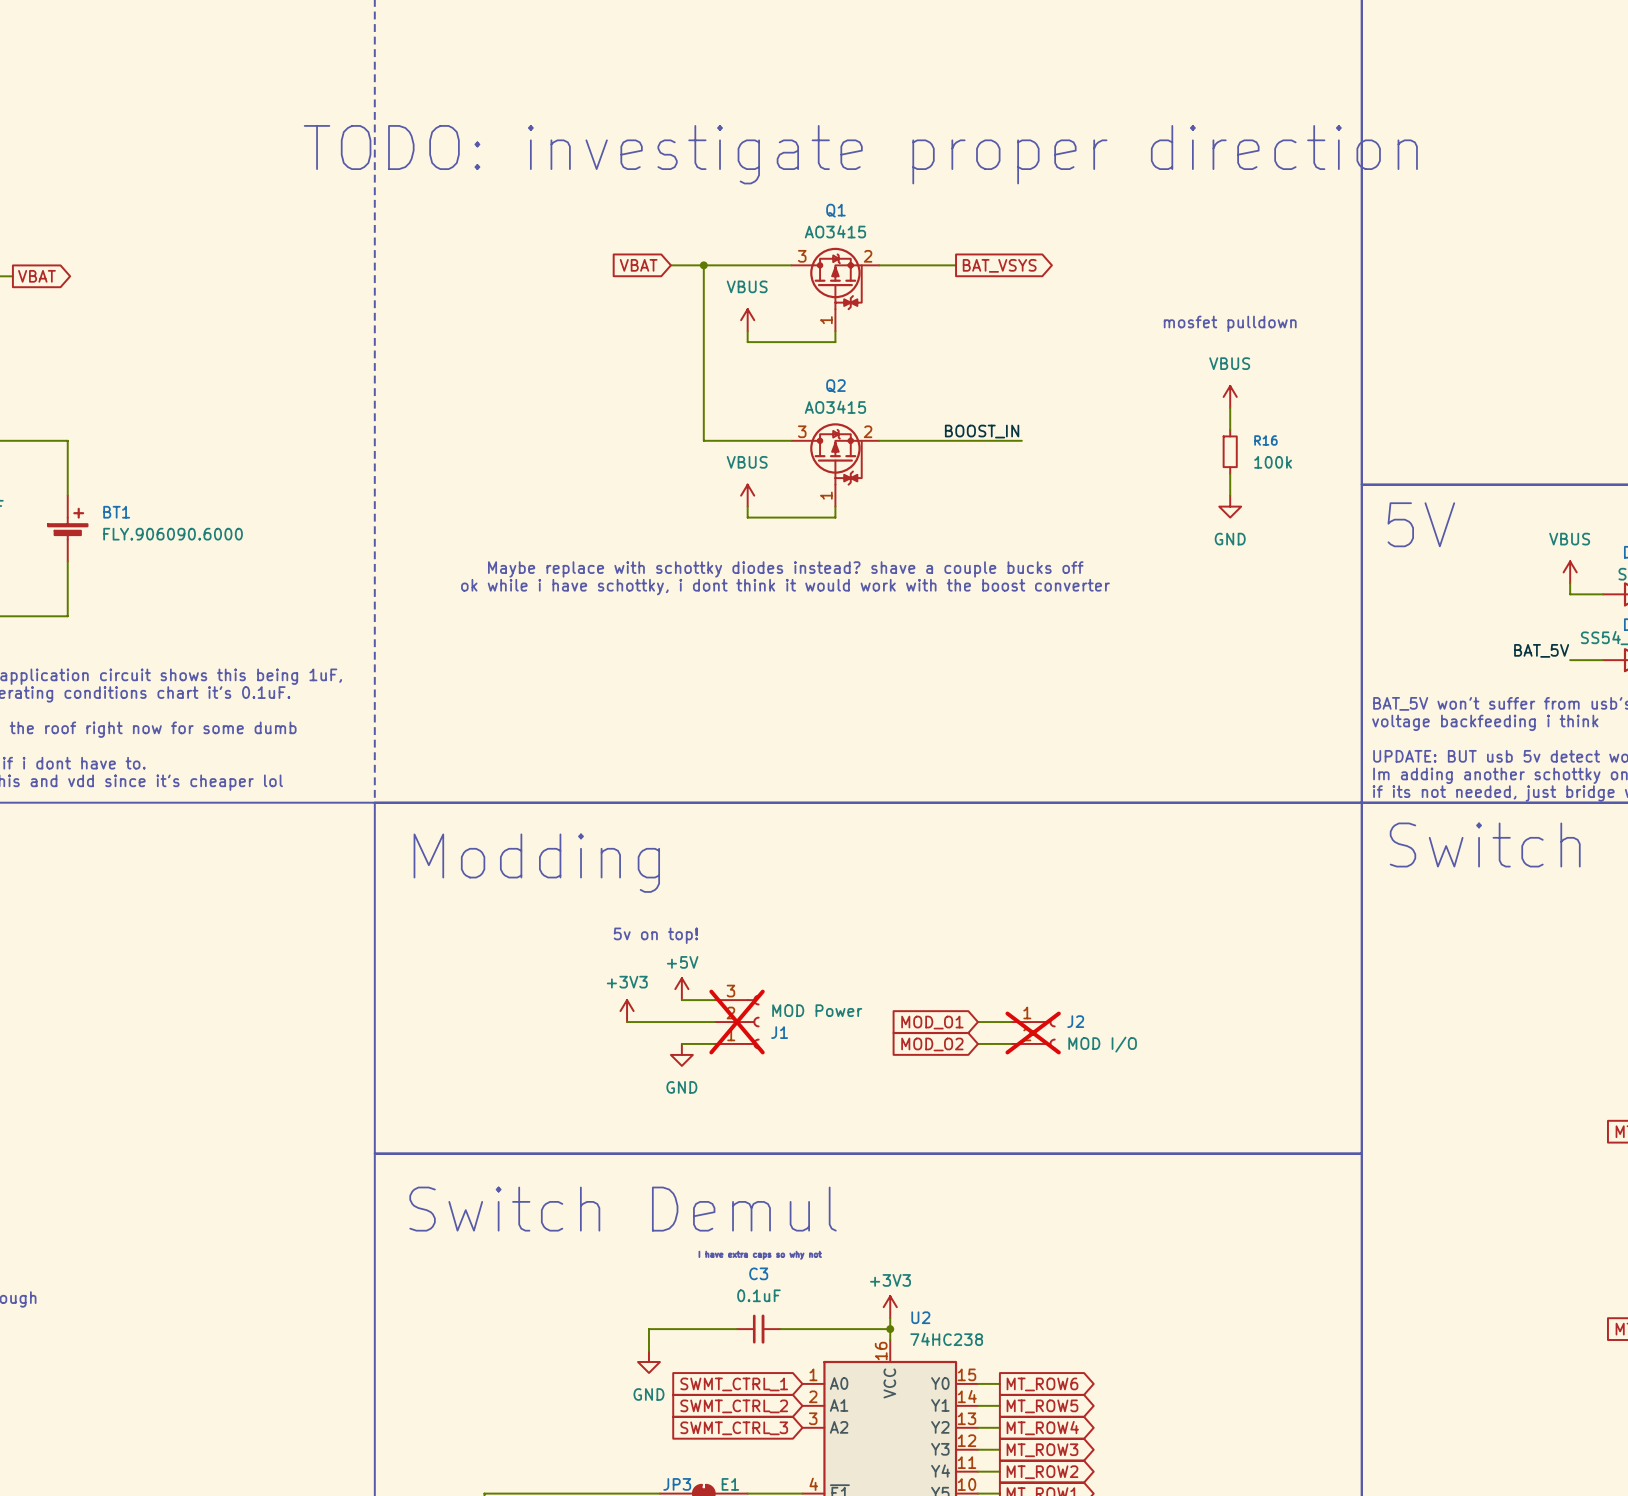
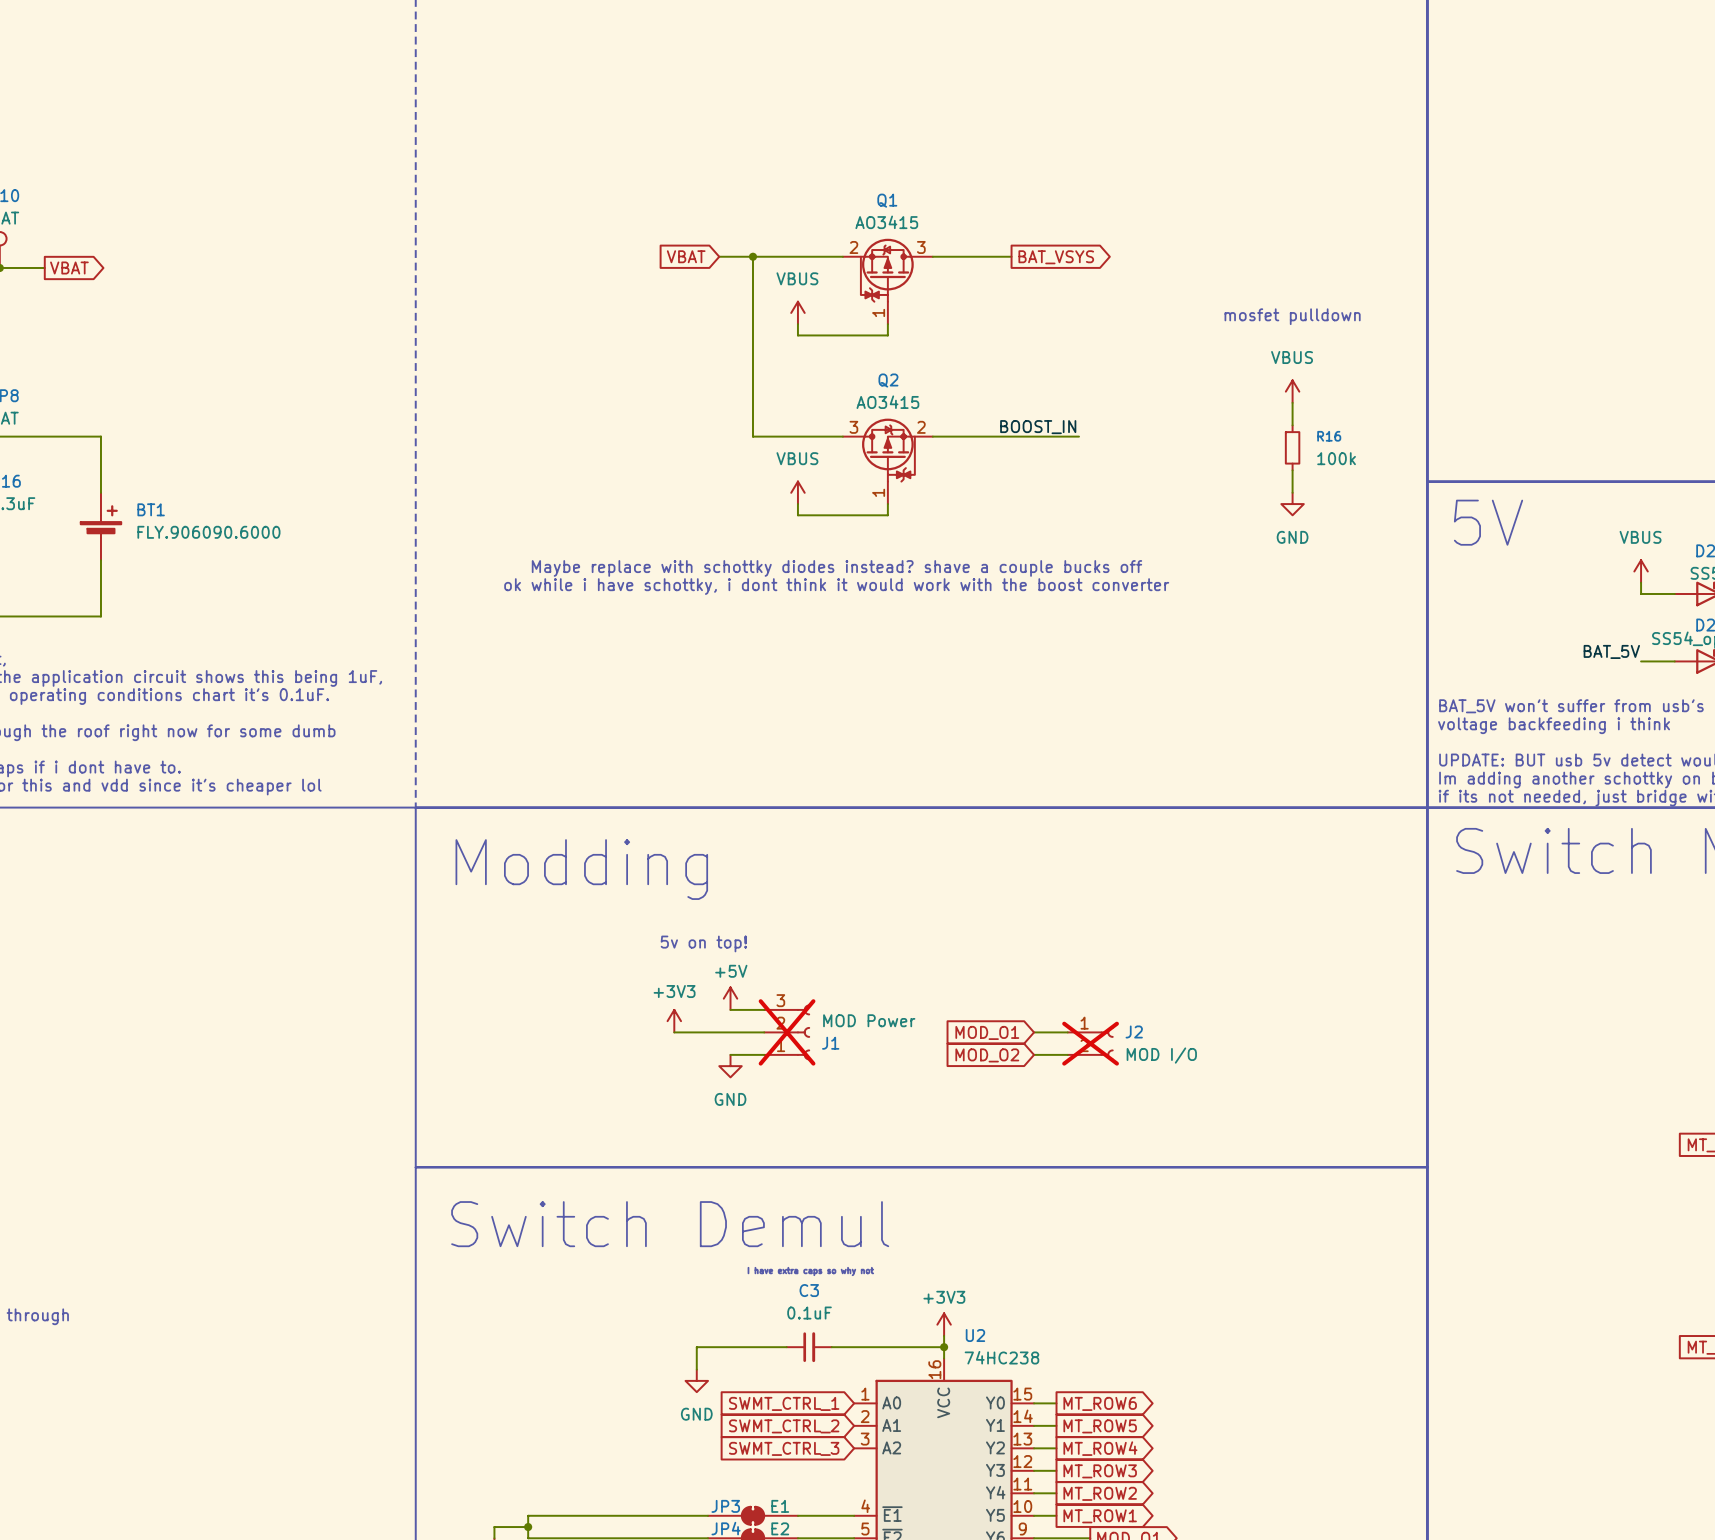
text: TODO: investigate proper direction (860, 154) -> none
Q1 flip: as is (835, 278) -> left-right (887, 270)

